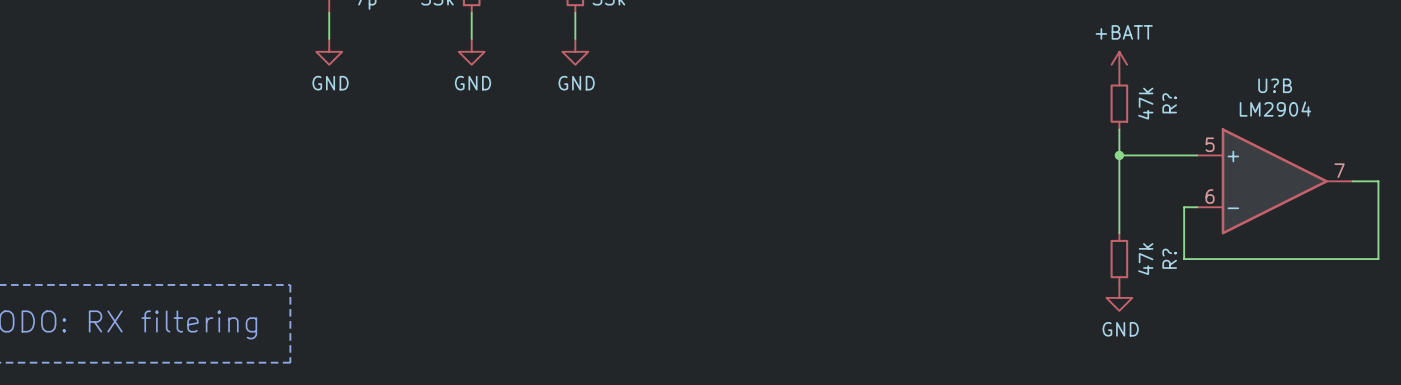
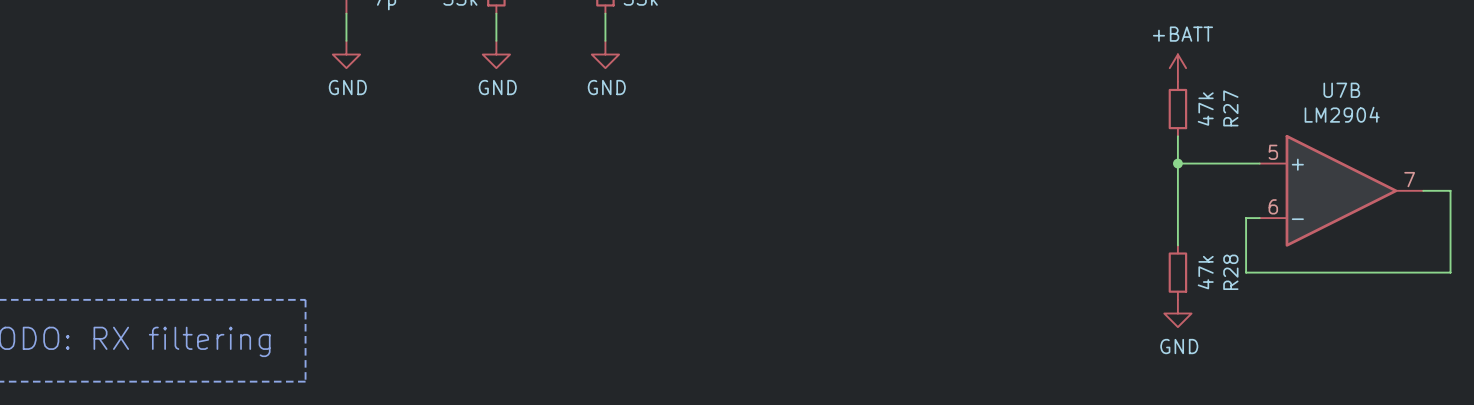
U?B name: U?B (1275, 85) -> U7B (1341, 90)
R? name: R? (1169, 103) -> R27 (1230, 108)
R? name: R? (1169, 258) -> R28 (1230, 272)

